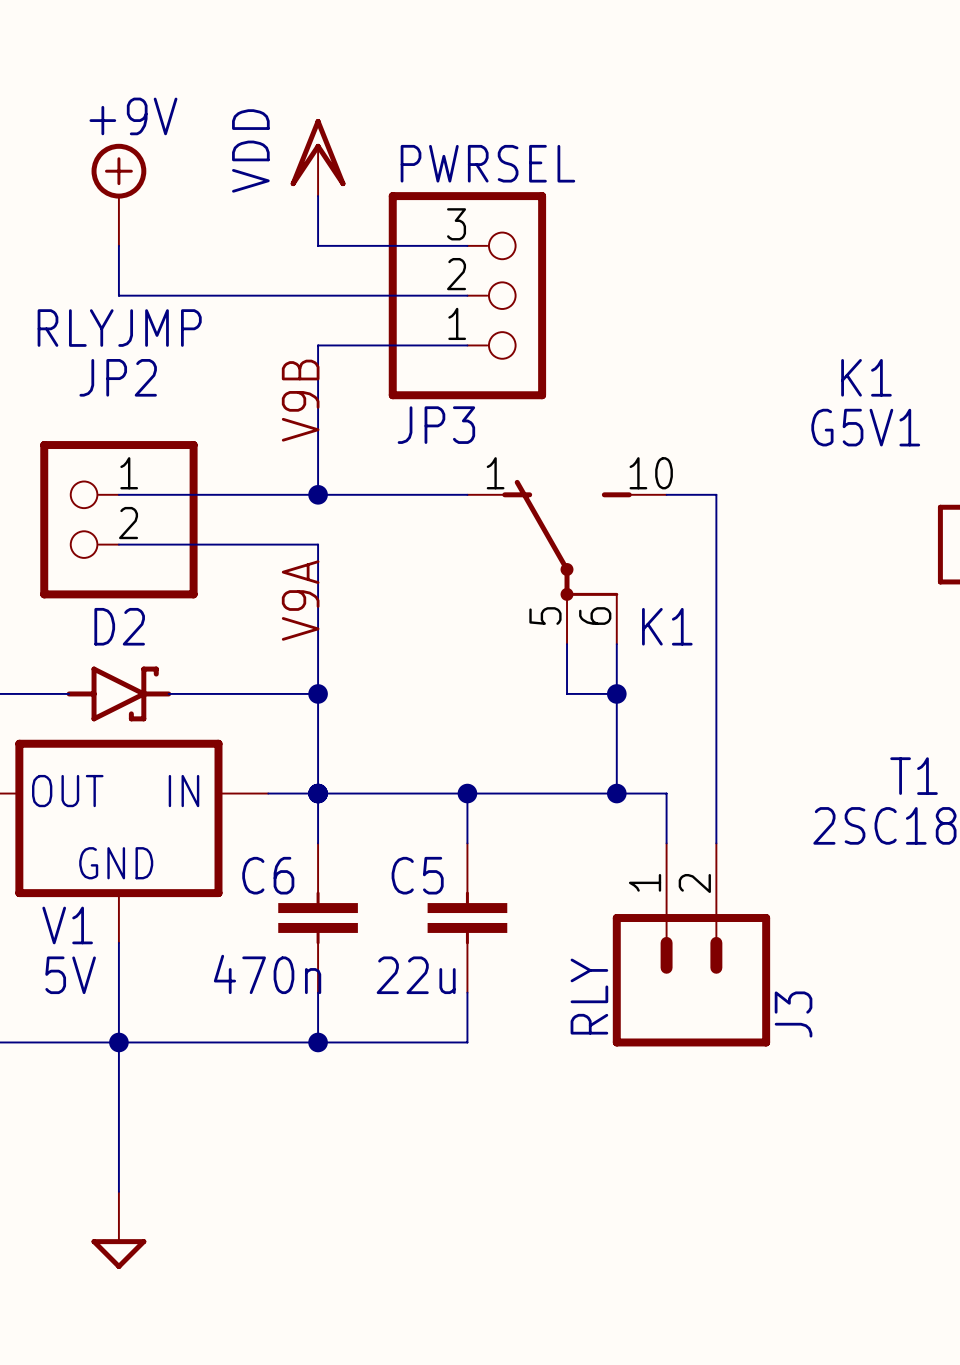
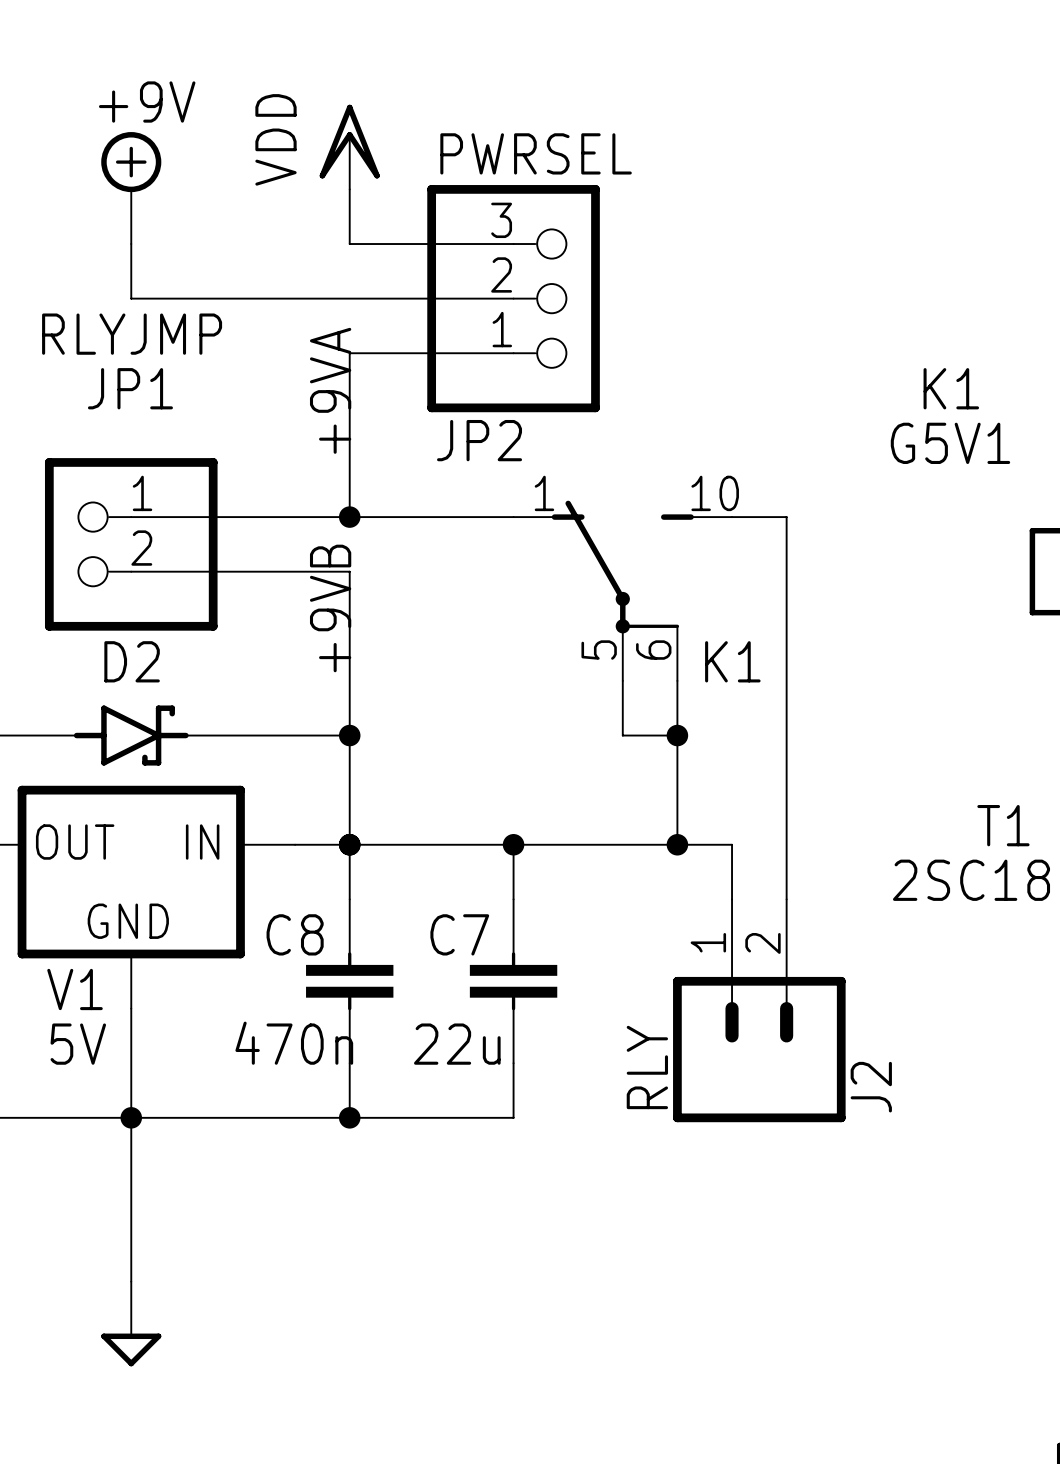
JP2 name: JP2 (118, 377) -> JP1 (130, 388)
label: V9B (300, 400) -> +9VA (330, 390)
JP3 name: JP3 (436, 425) -> JP2 (479, 440)
label: V9A (300, 600) -> +9VB (330, 608)
C6 name: C6 (268, 875) -> C8 (295, 934)
C5 name: C5 (417, 875) -> C7 (459, 934)
J3 name: J3 (793, 1014) -> J2 (871, 1087)

